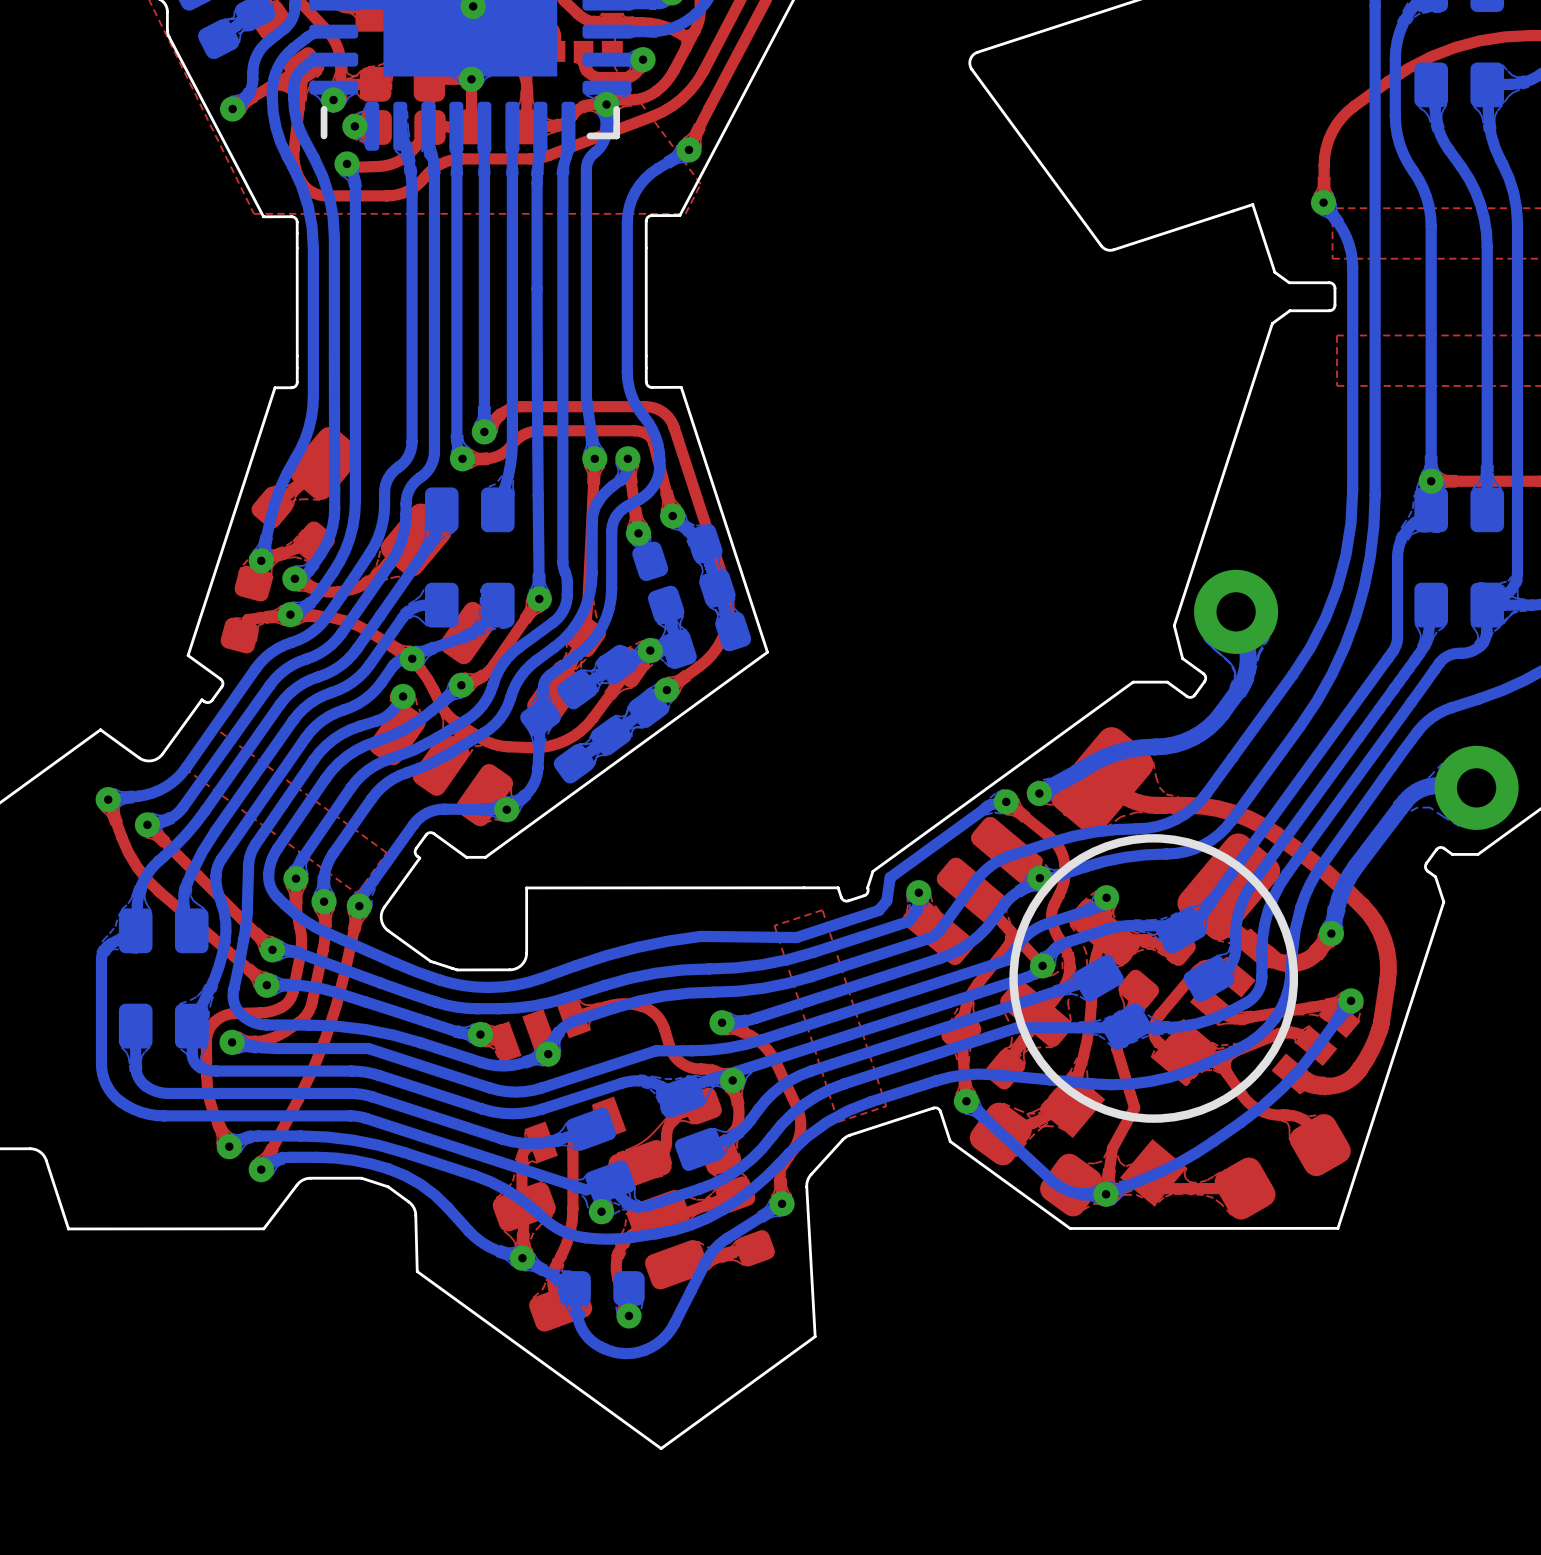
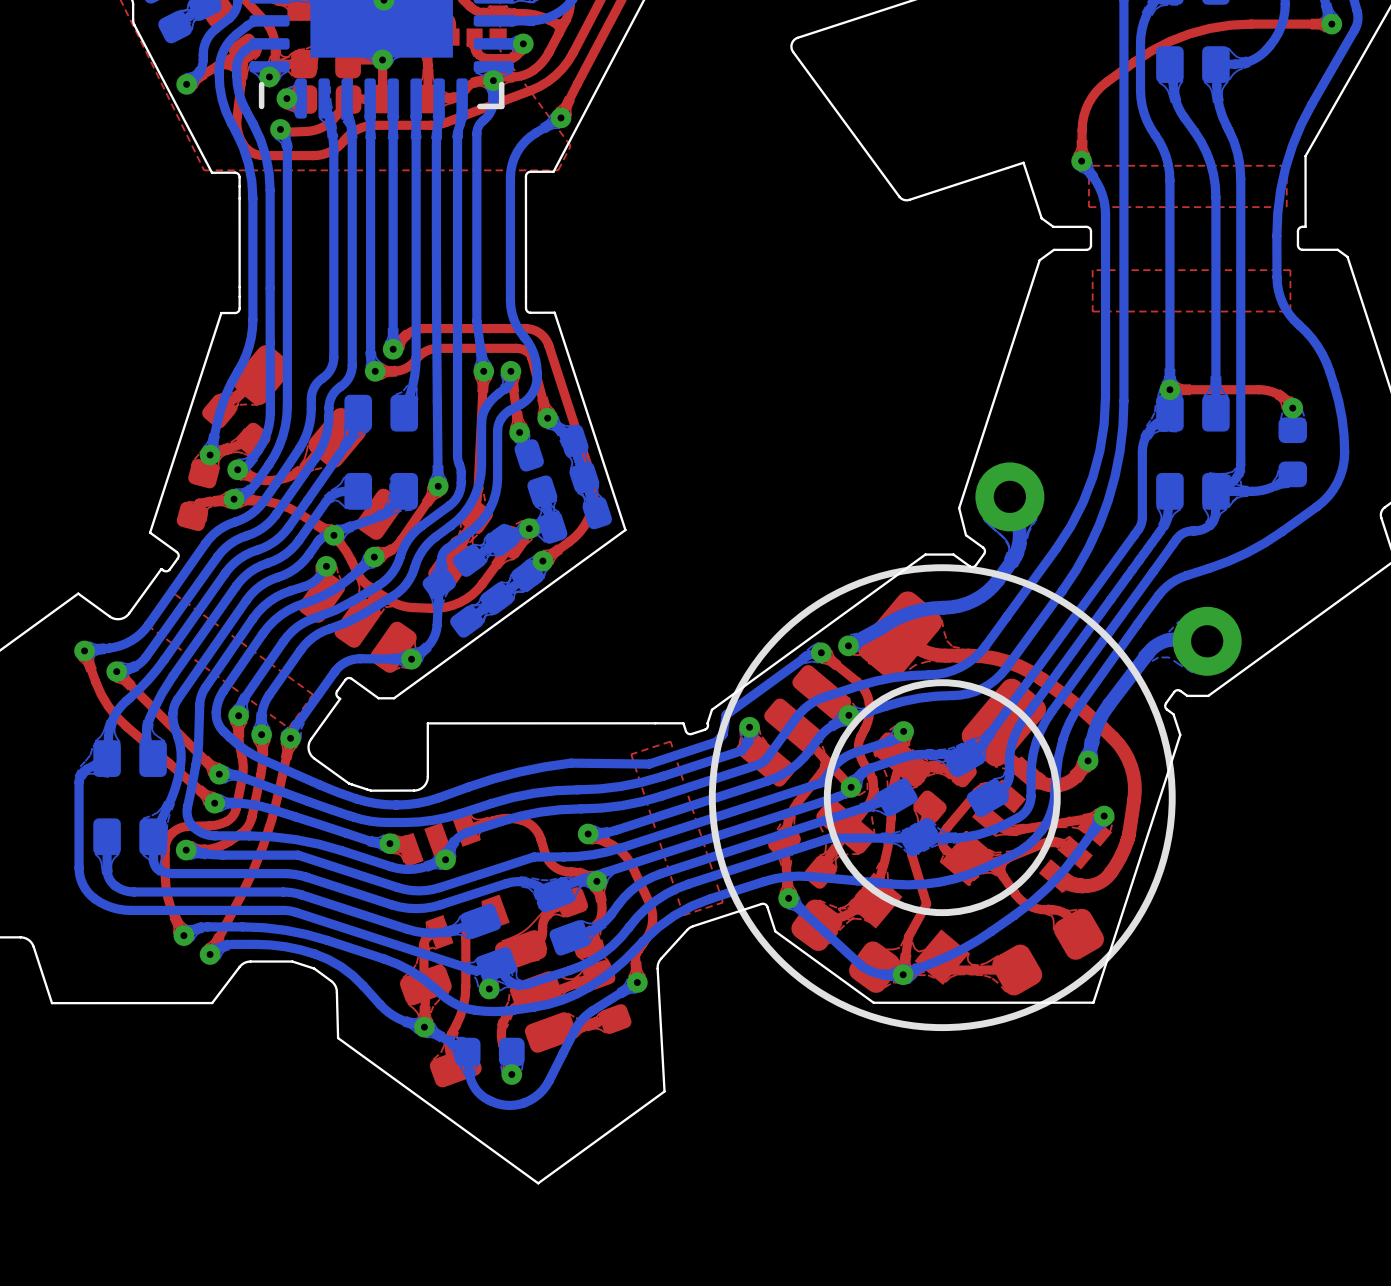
drawing: none -> [708, 564, 1176, 1032]

